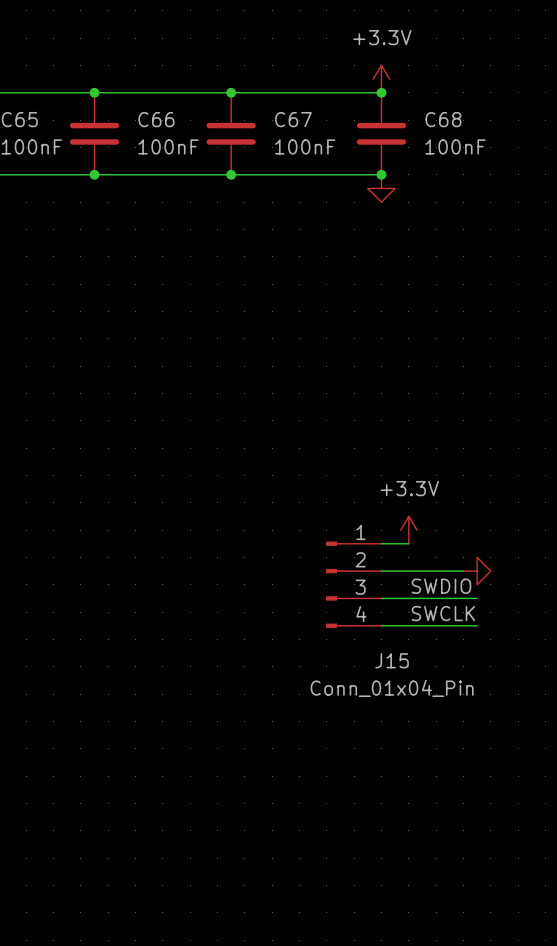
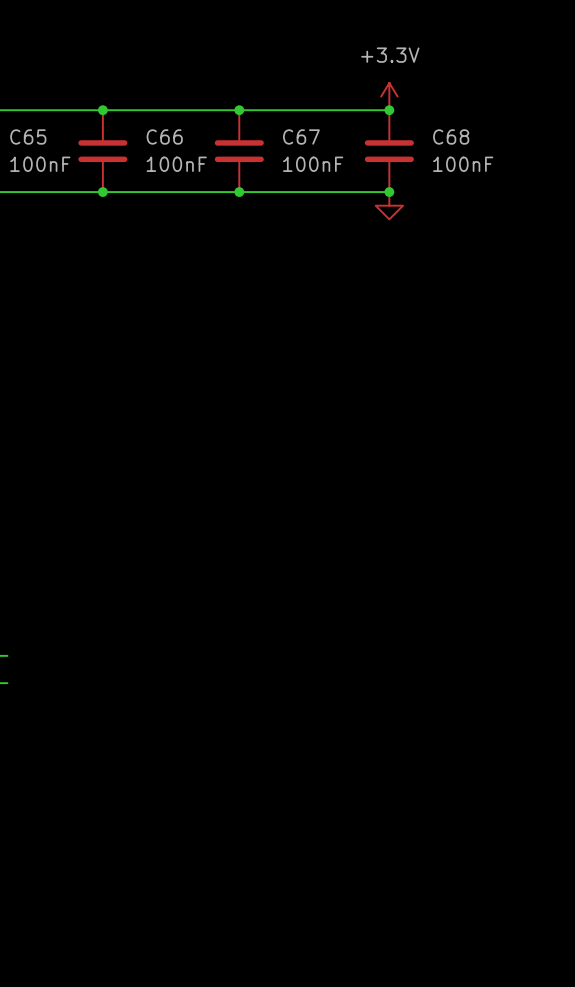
power symbol: +3.3V (408, 530) -> none
wire: (381, 543) (408, 543) -> none
wire: (381, 571) (463, 571) -> none
power symbol: (477, 571) -> none
J15: Conn_01x04_Pin (353, 584) -> none
label: SWDIO (441, 586) -> none
wire: (381, 598) (477, 598) -> none
label: SWCLK (443, 613) -> none
wire: (381, 625) (477, 625) -> none

